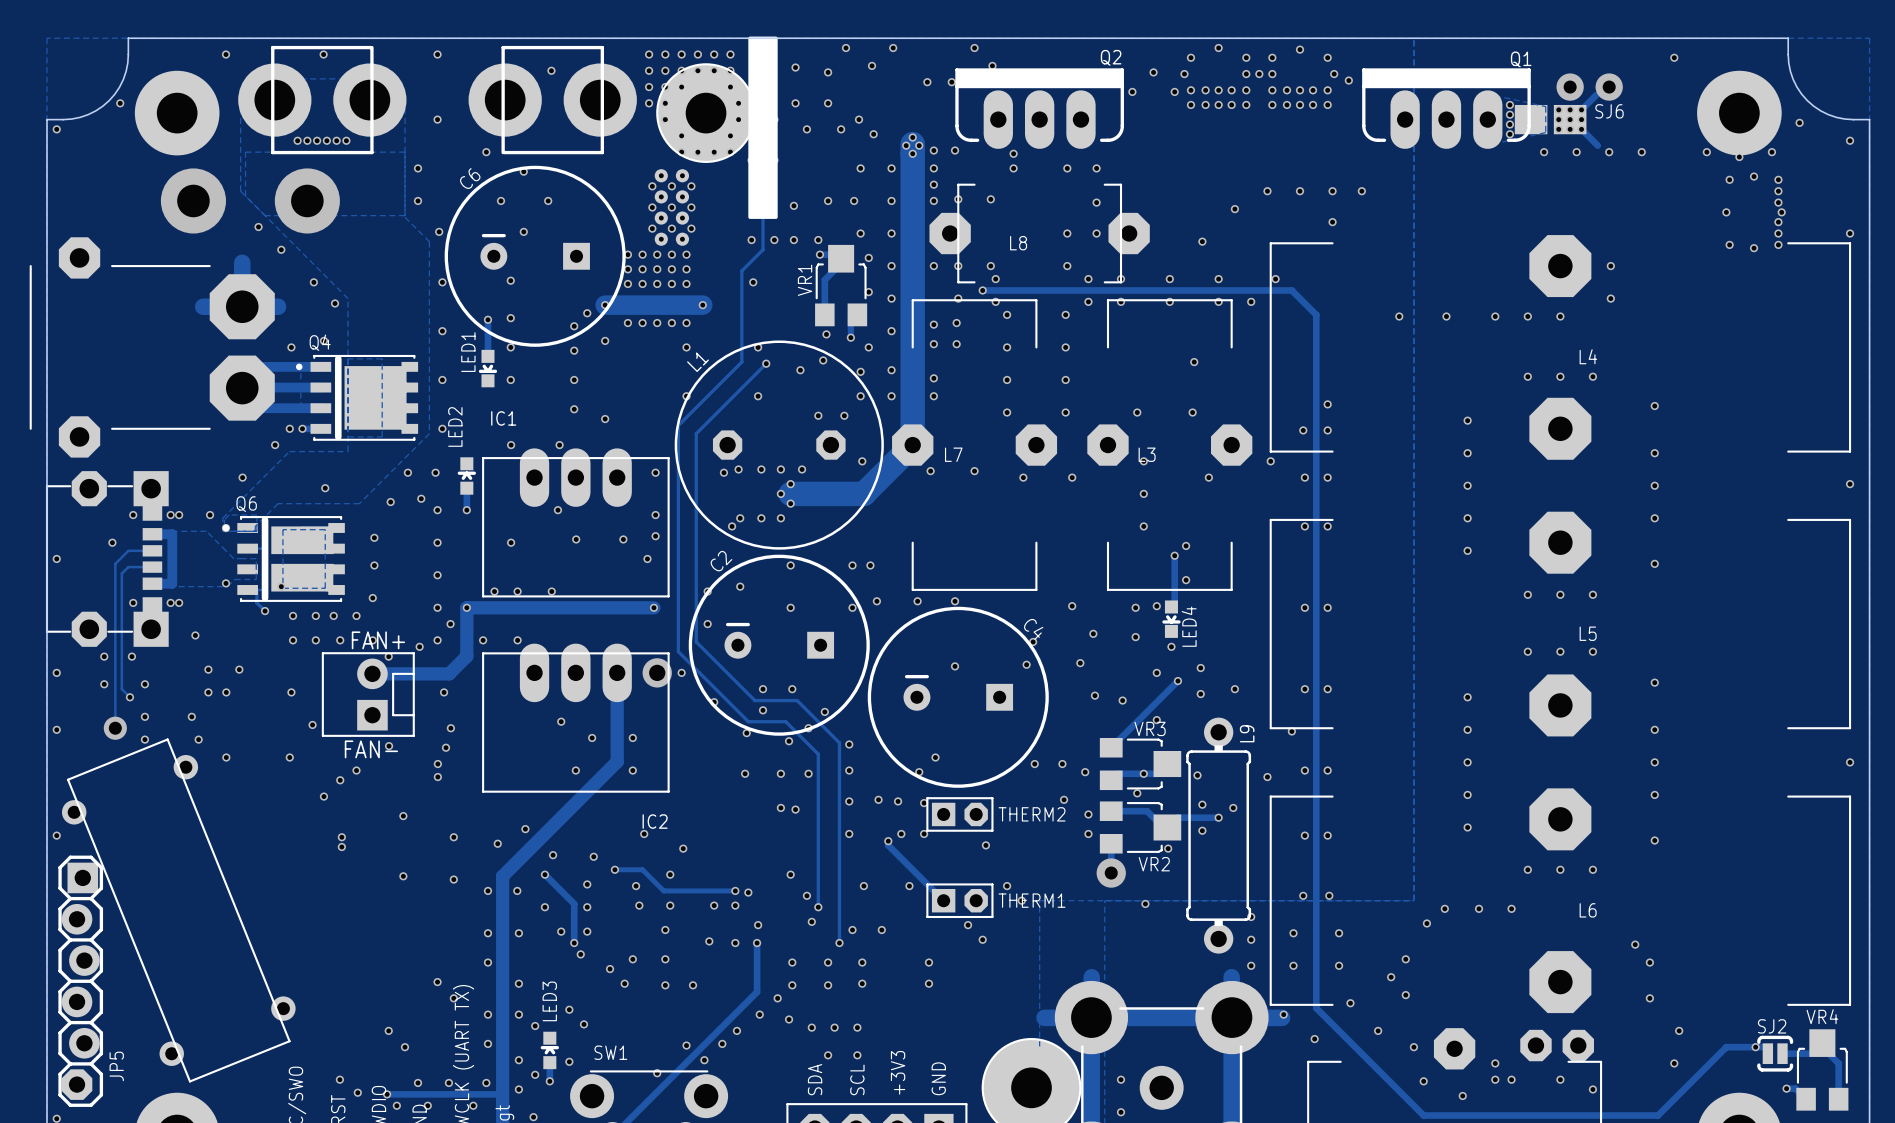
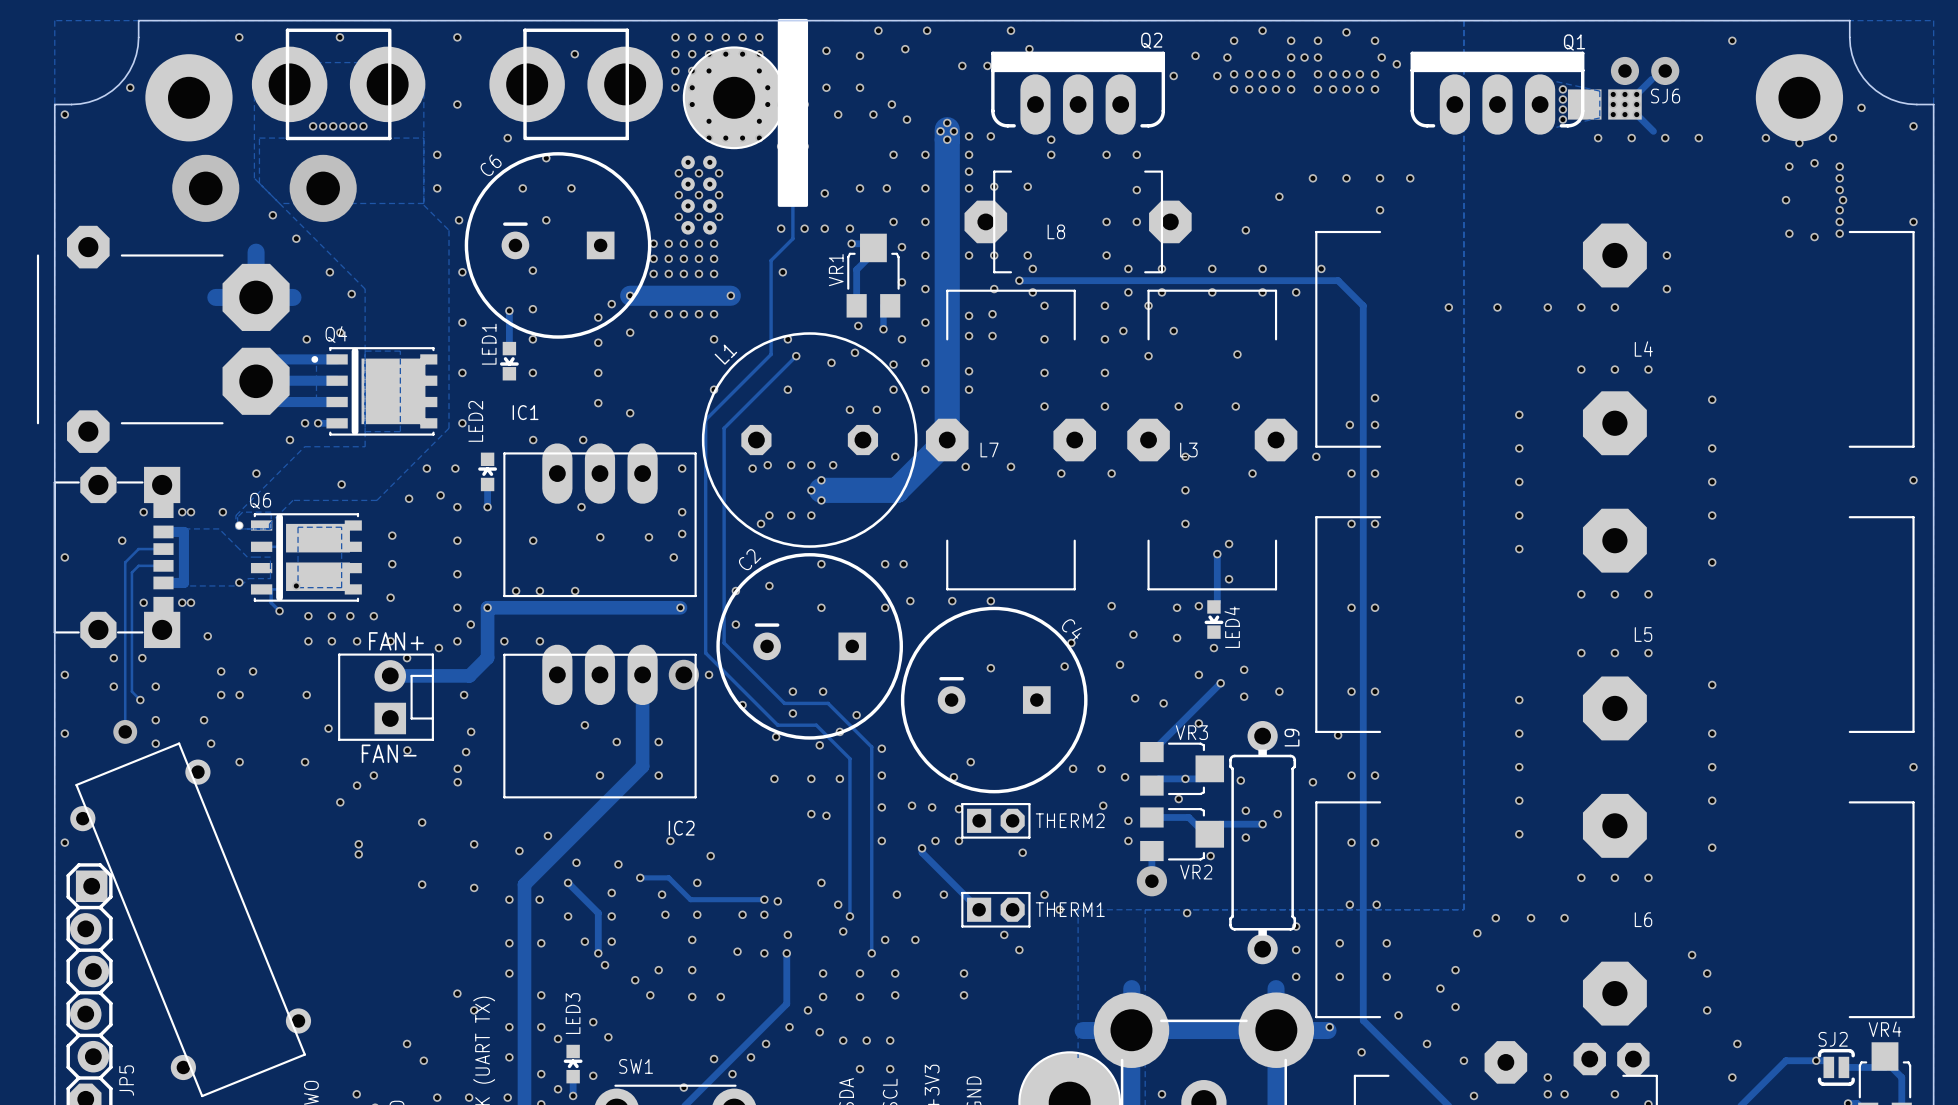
via: none -> (1148, 305)
via: none -> (1123, 330)
via: none -> (1173, 330)
via: none -> (1148, 356)

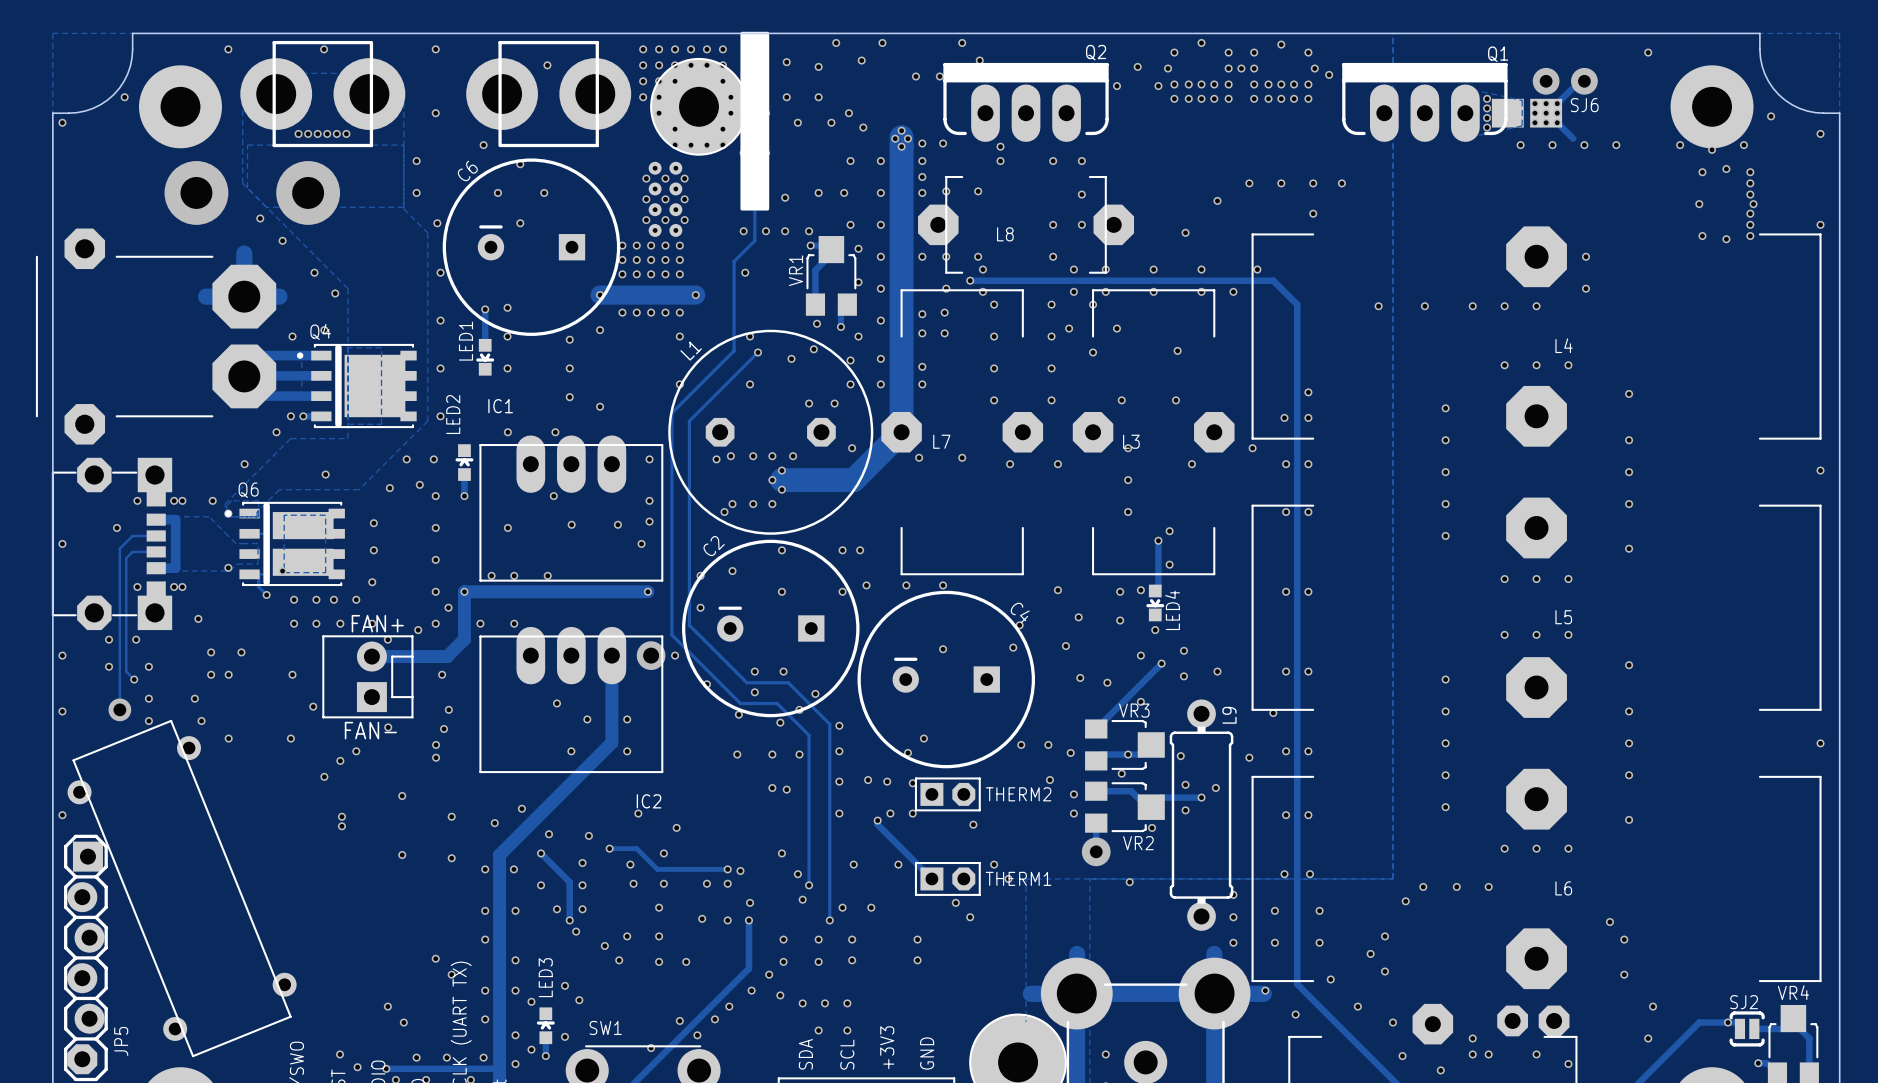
via: (532, 270) -> none
via: (611, 304) -> none
via: (598, 317) -> none

